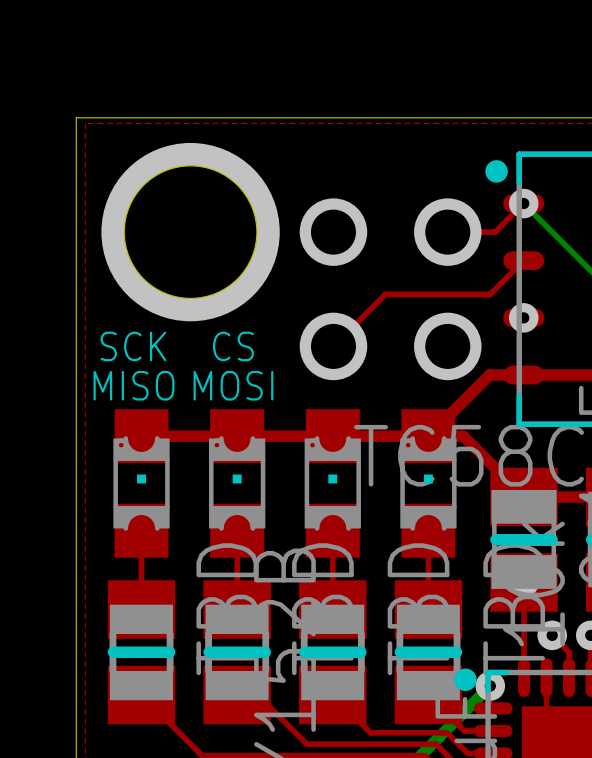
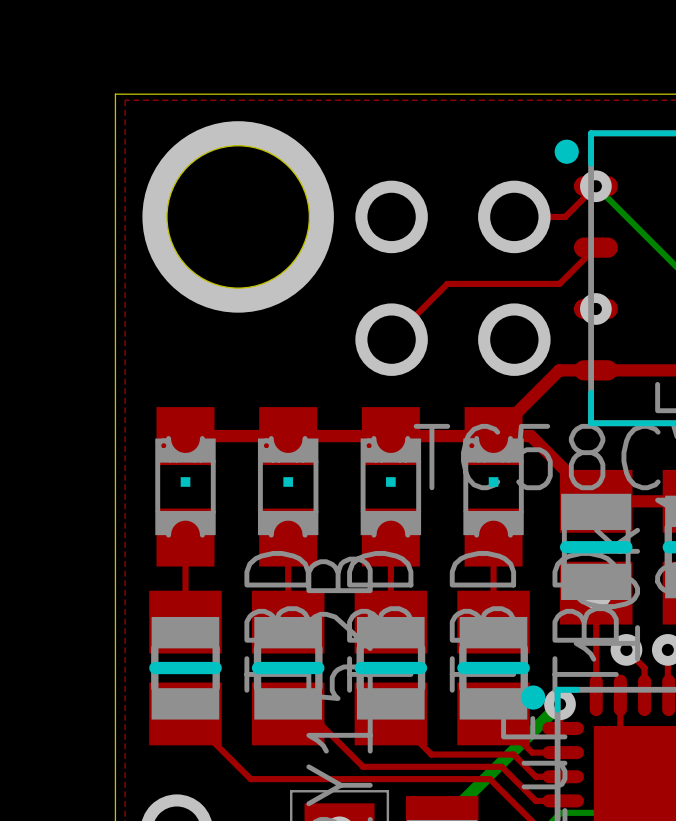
text: SCK (133, 346) -> none
text: CS (233, 346) -> none
text: MISO (134, 385) -> none
text: MOSI (233, 385) -> none

